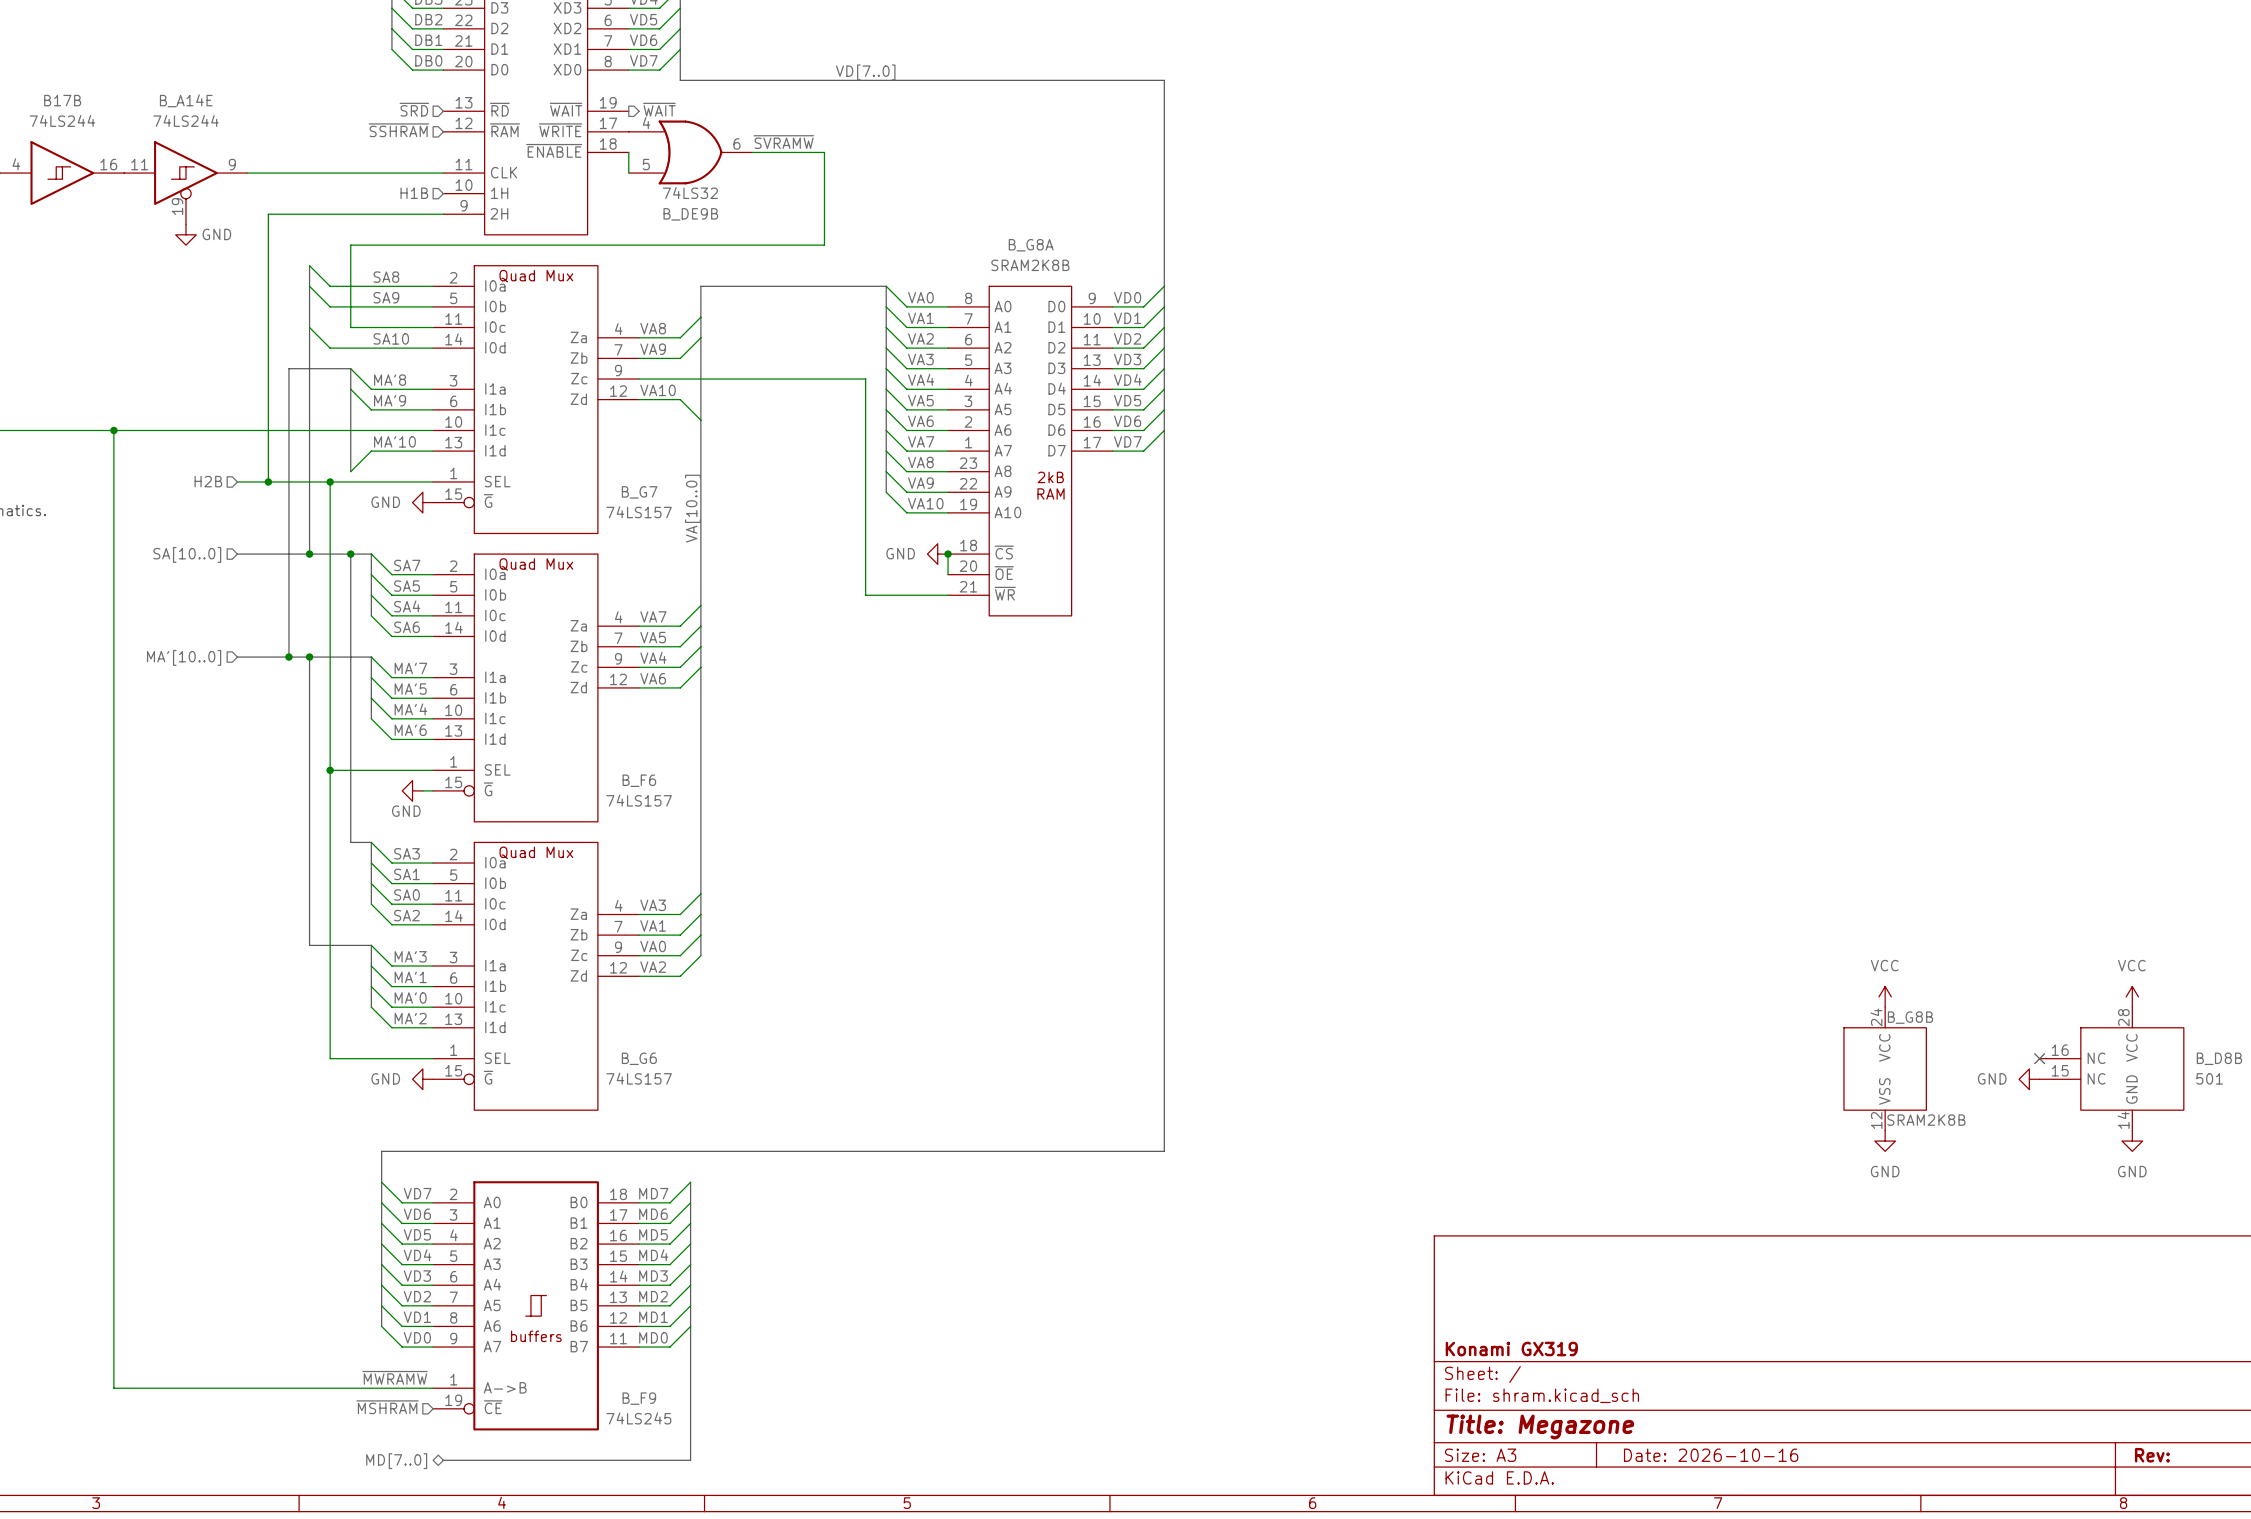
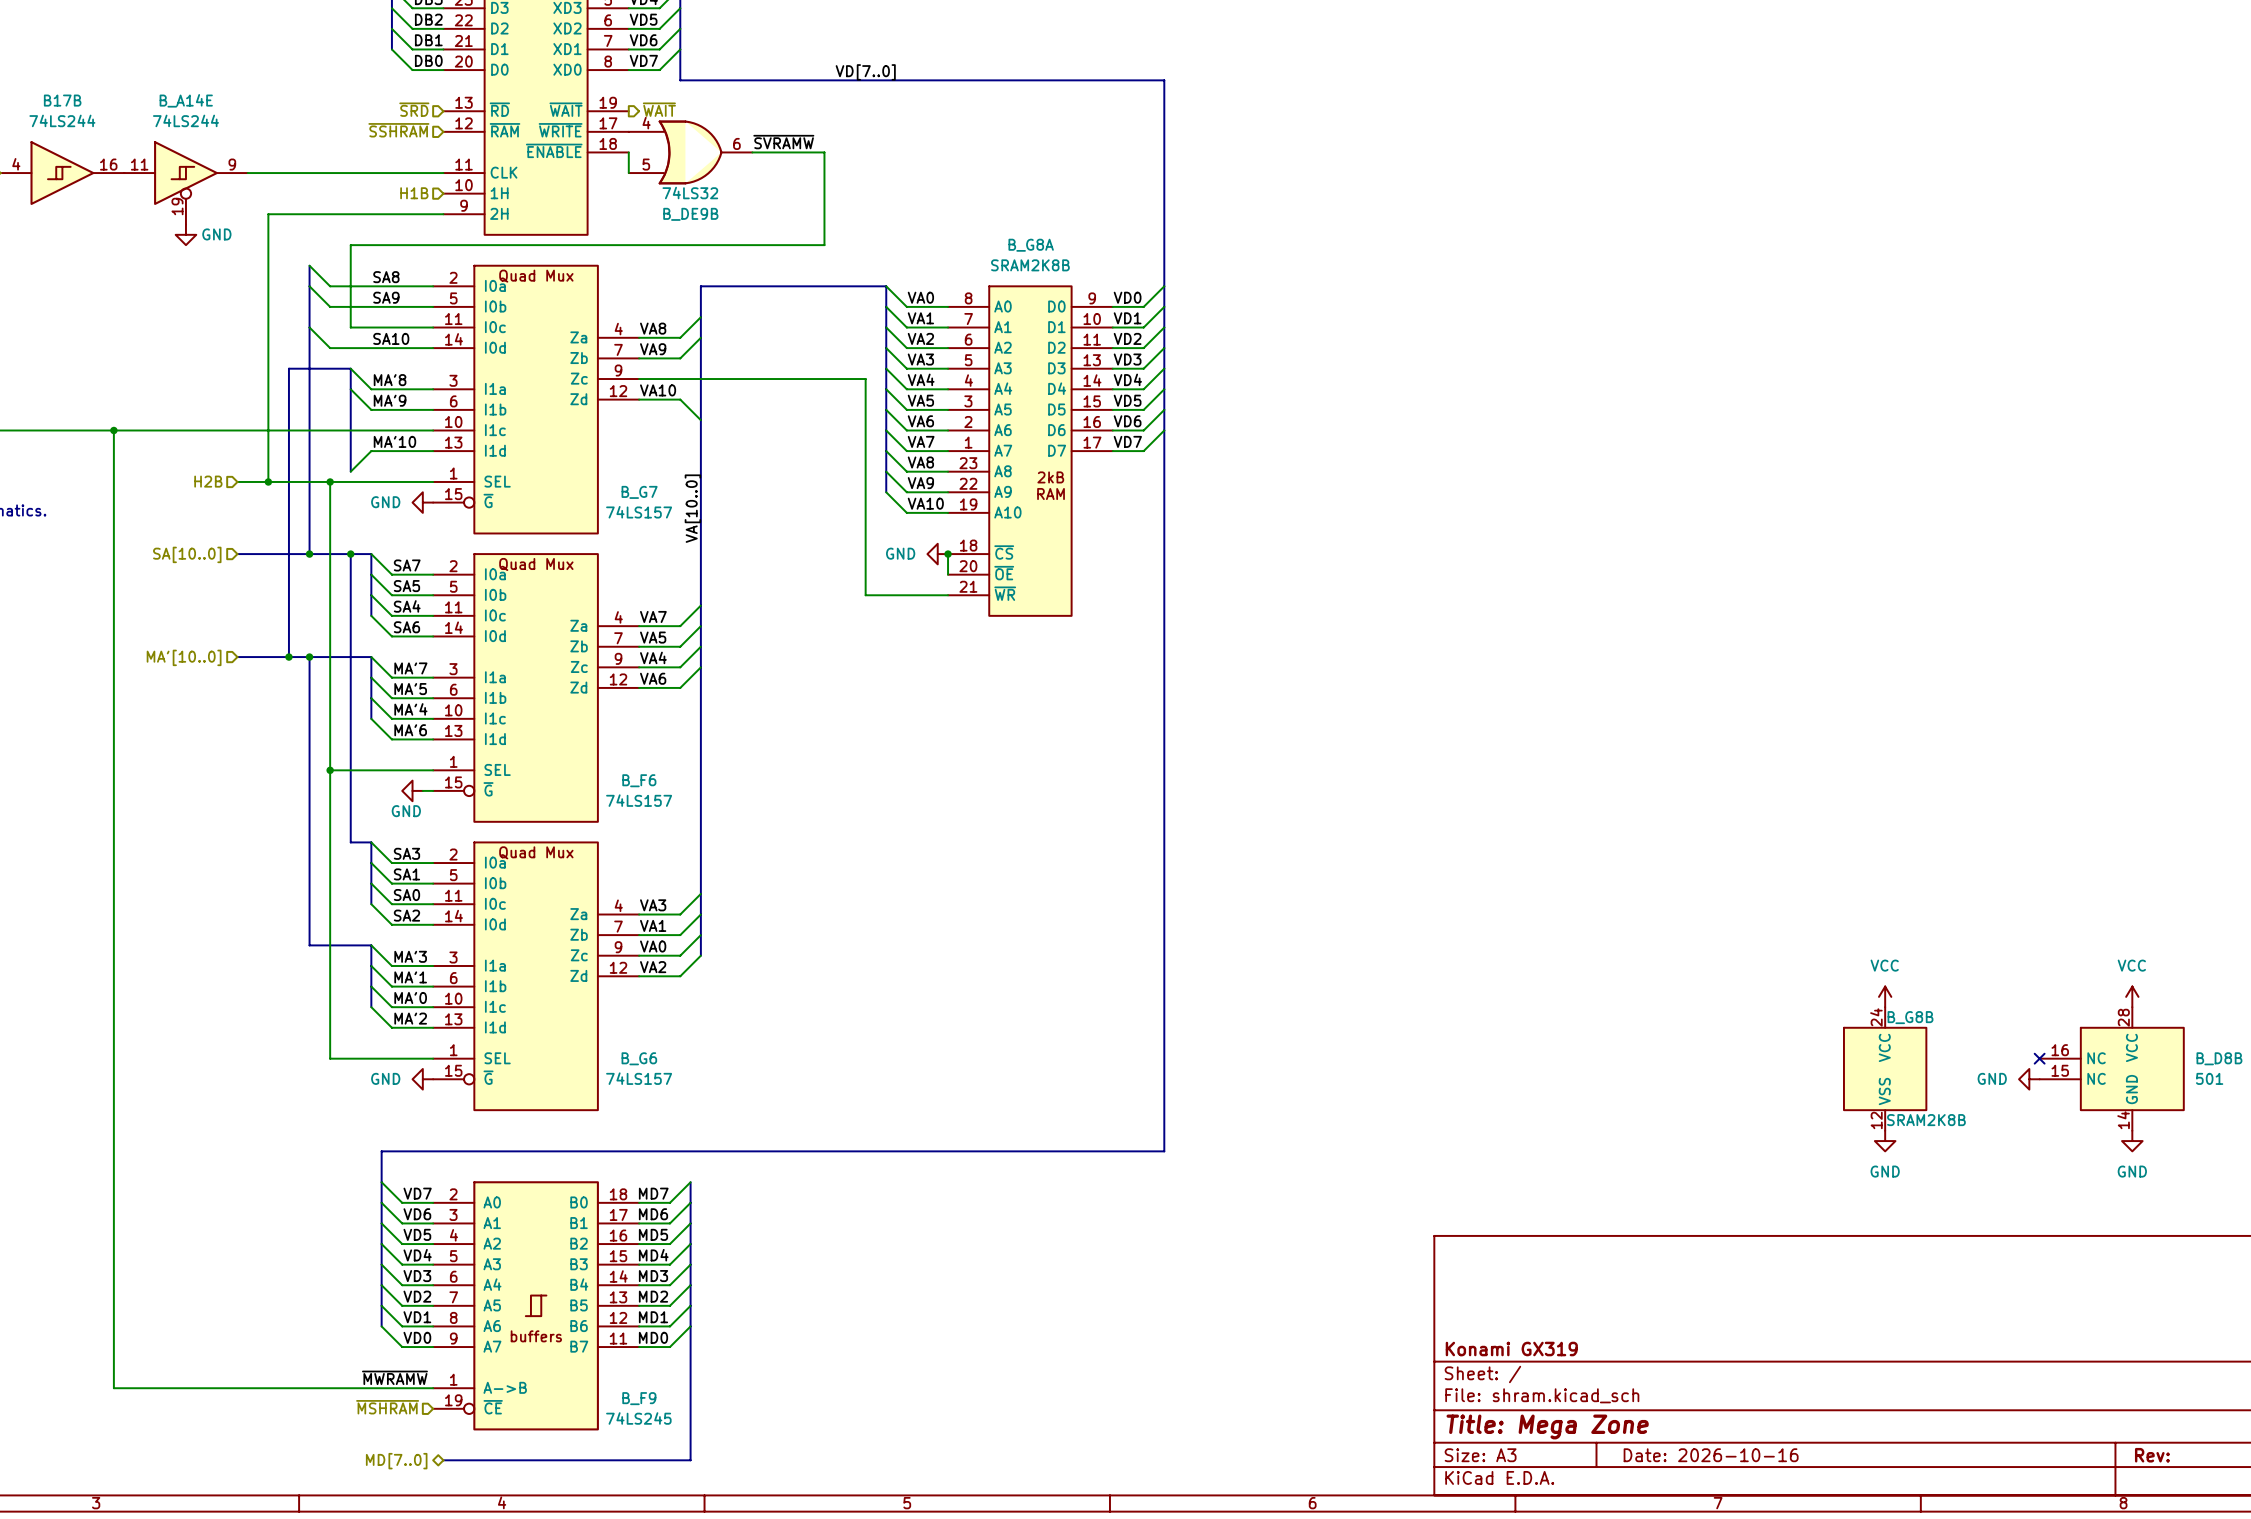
title block: Title: Megazone (1540, 1426) -> Title: Mega Zone (1547, 1426)

